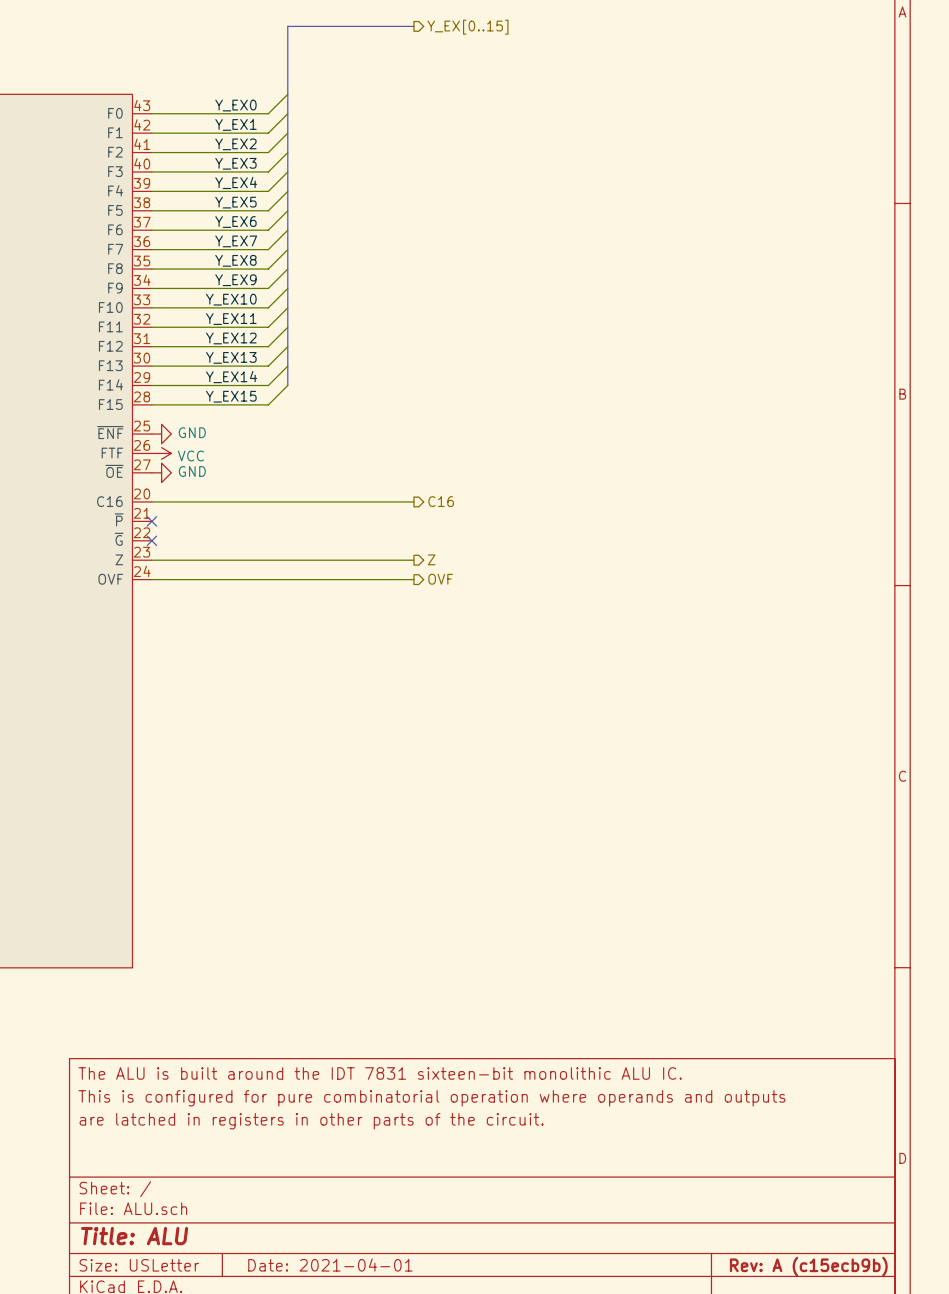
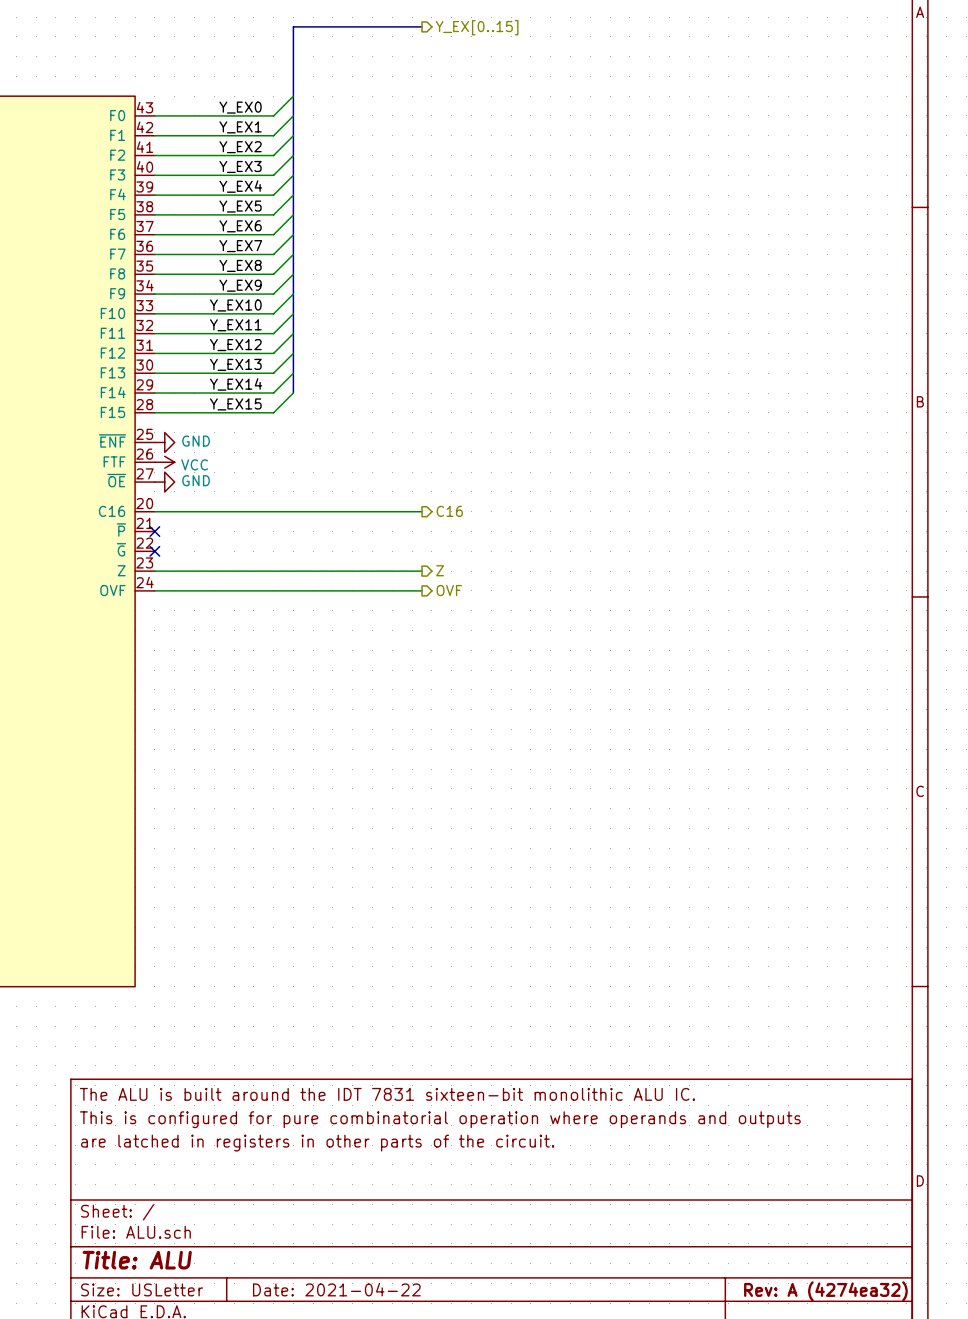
title block: Date: 2021-04-01 (330, 1265) -> Date: 2021-04-22 (336, 1289)
title block: Rev: A (c15ecb9b) (808, 1266) -> Rev: A (4274ea32) (825, 1291)

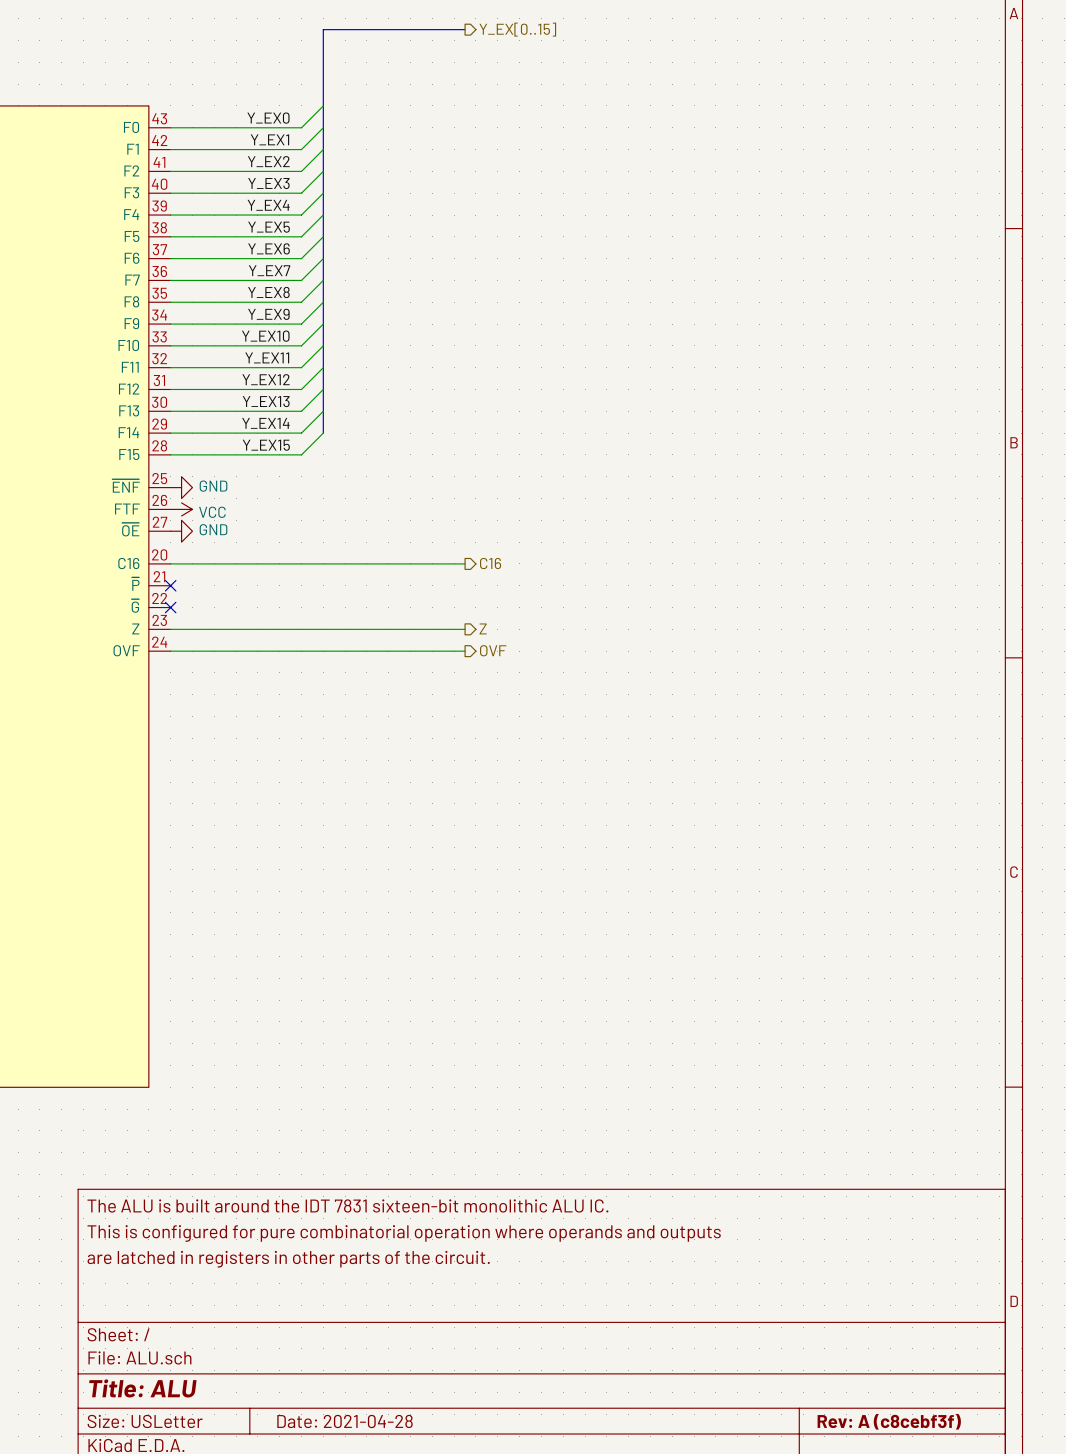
title block: Date: 2021-04-22 (336, 1289) -> Date: 2021-04-28 (345, 1421)
title block: Rev: A (4274ea32) (825, 1291) -> Rev: A (c8cebf3f) (889, 1421)

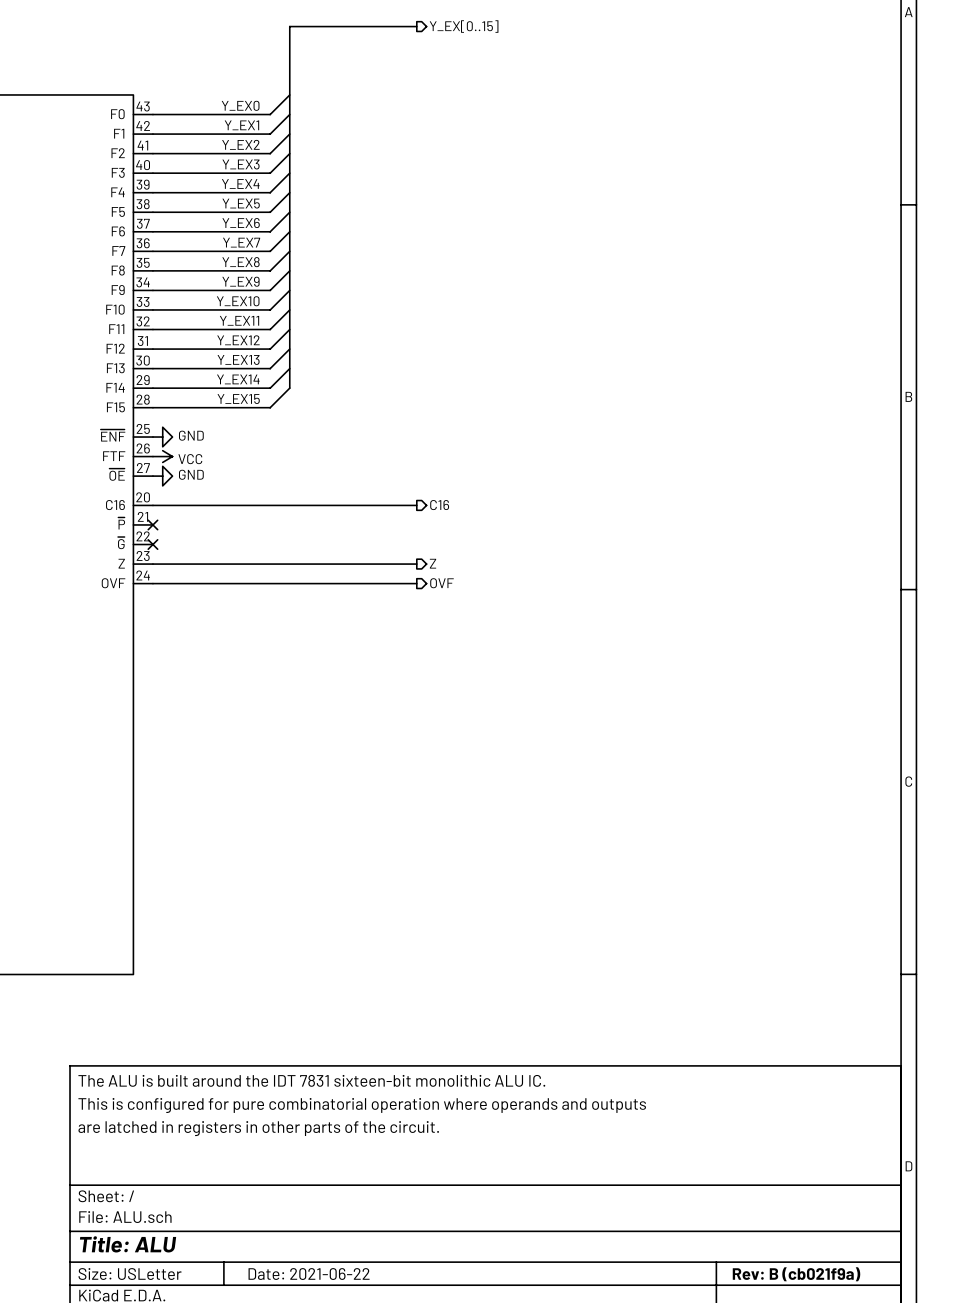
title block: Date: 2021-04-28 (345, 1421) -> Date: 2021-06-22 (309, 1274)
title block: Rev: A (c8cebf3f) (889, 1421) -> Rev: B (cb021f9a) (796, 1274)

